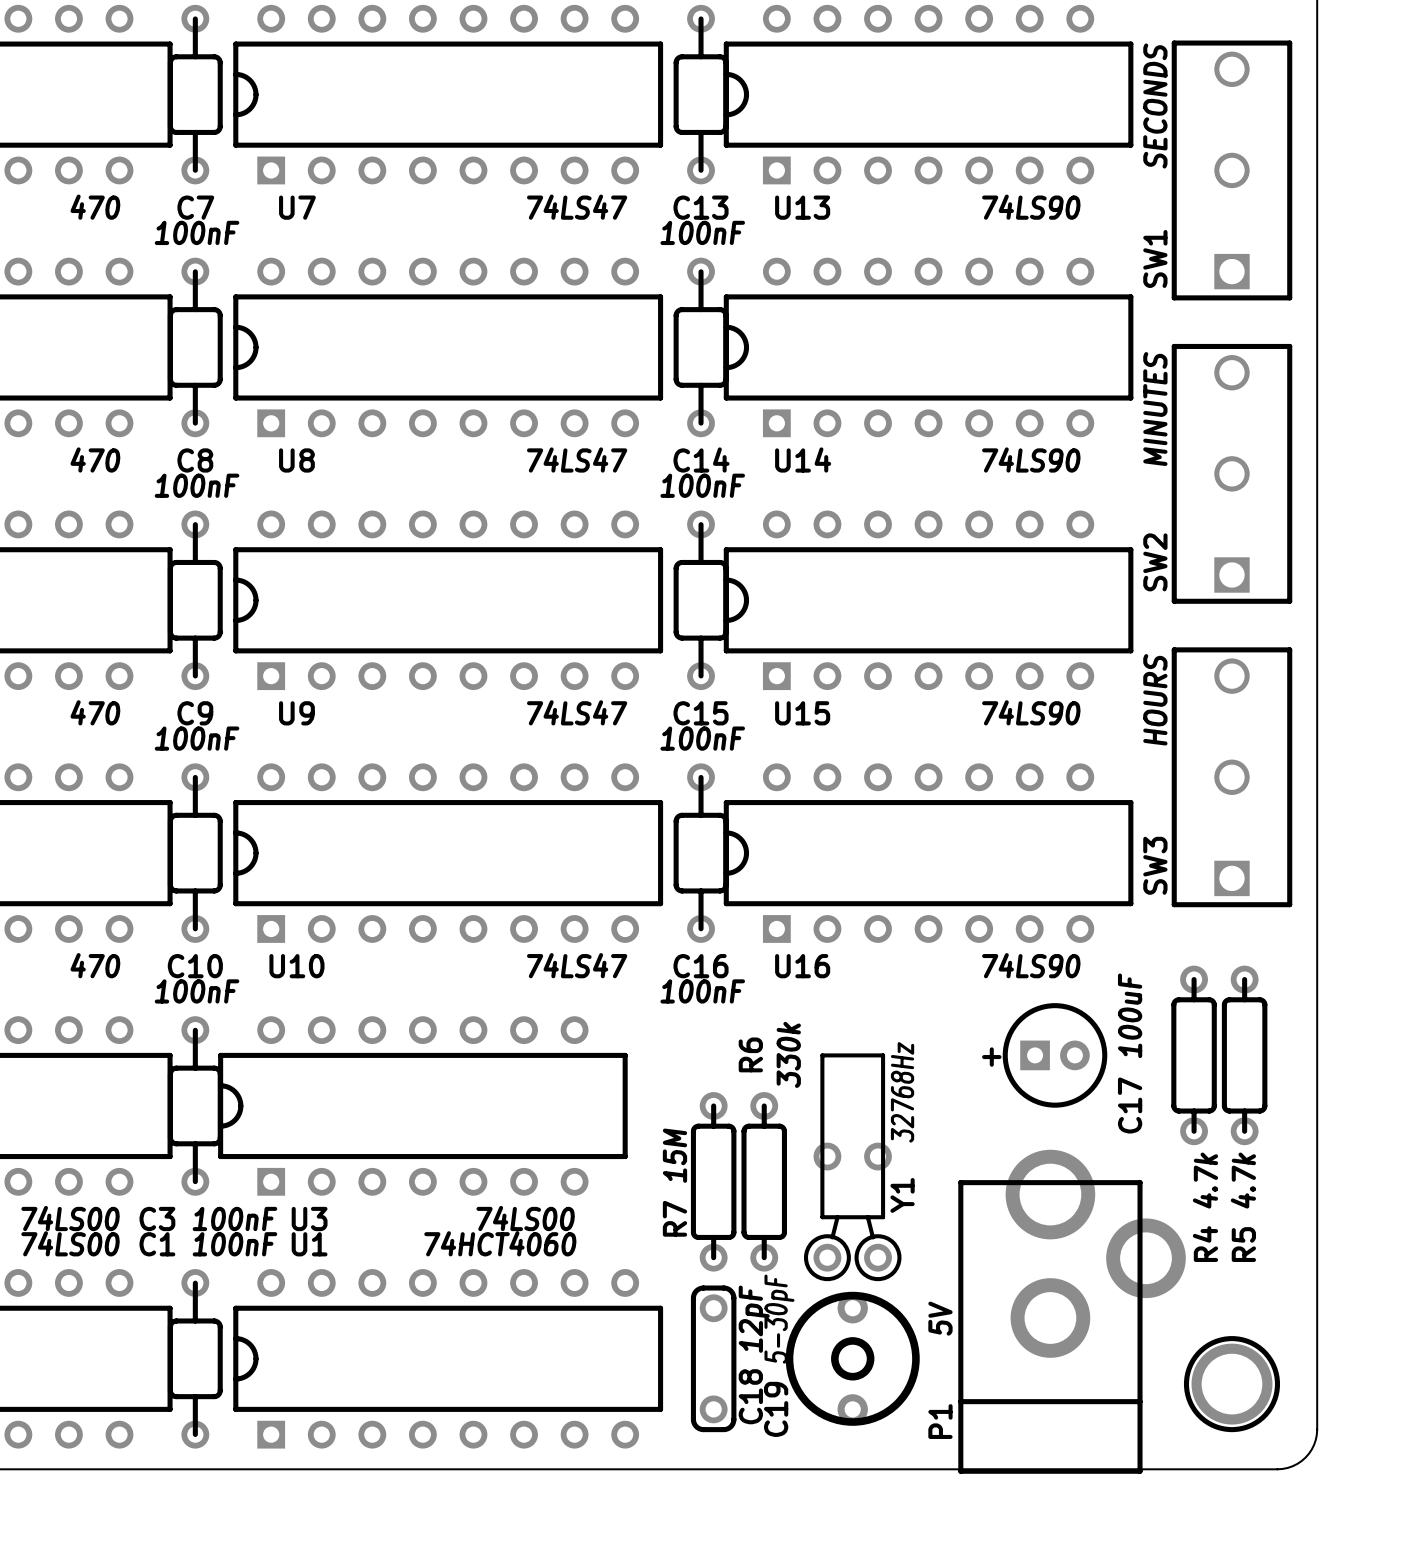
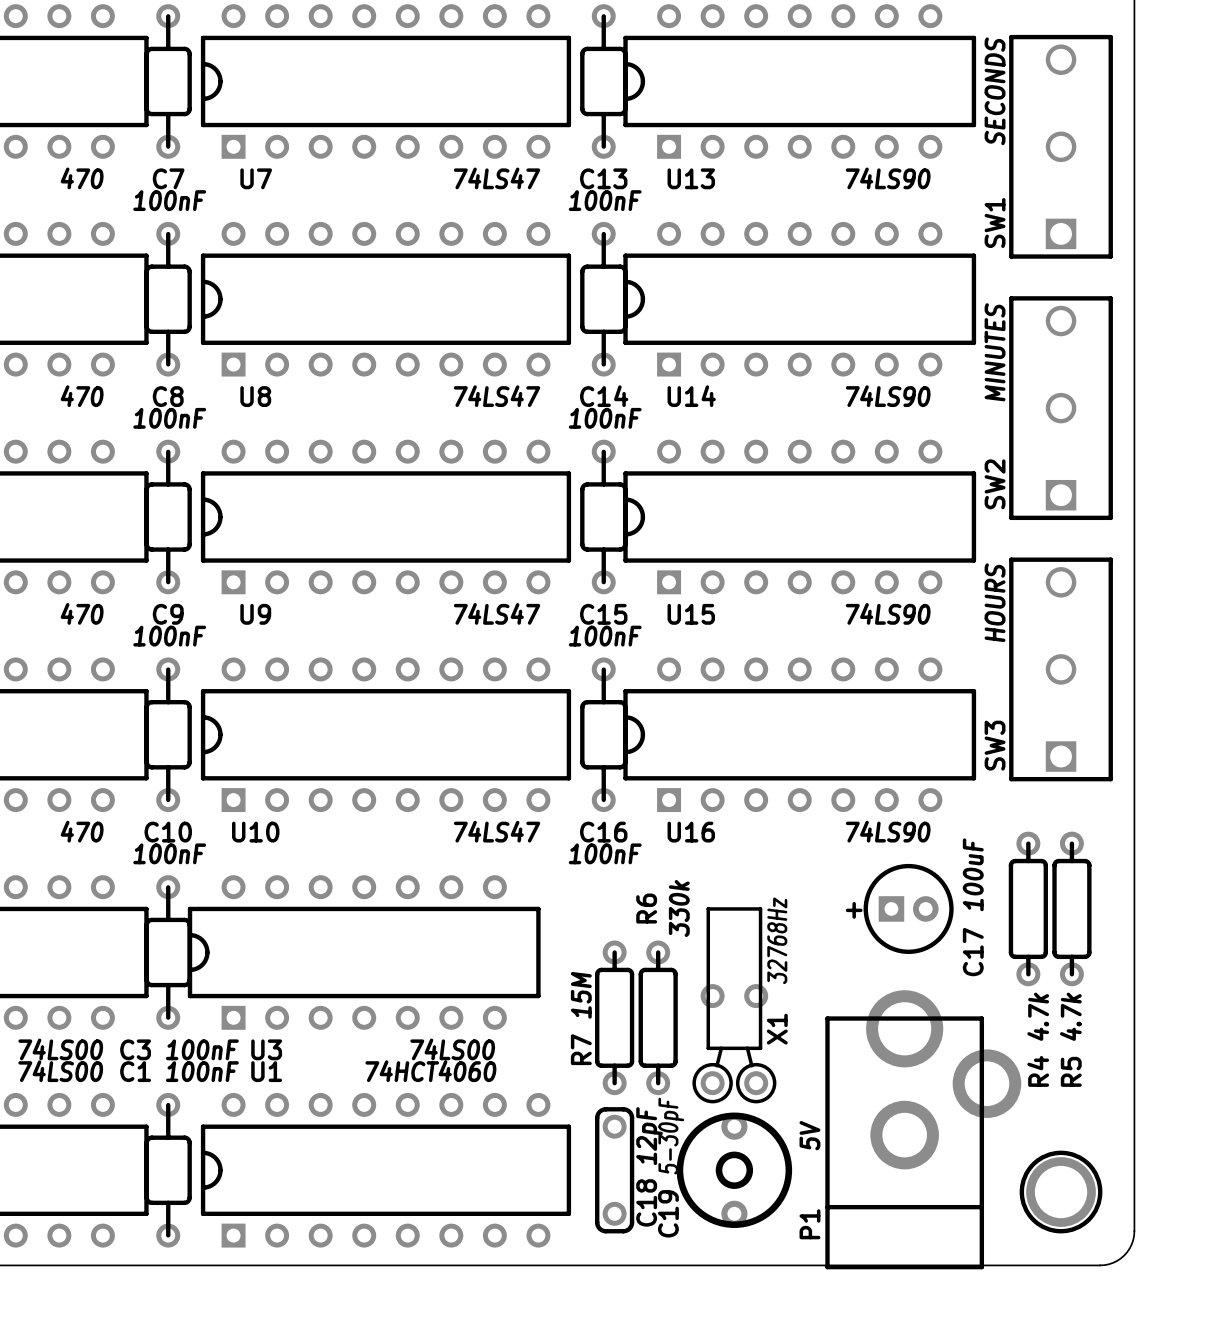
Y1 name: Y1 (902, 1195) -> X1 (777, 1029)

